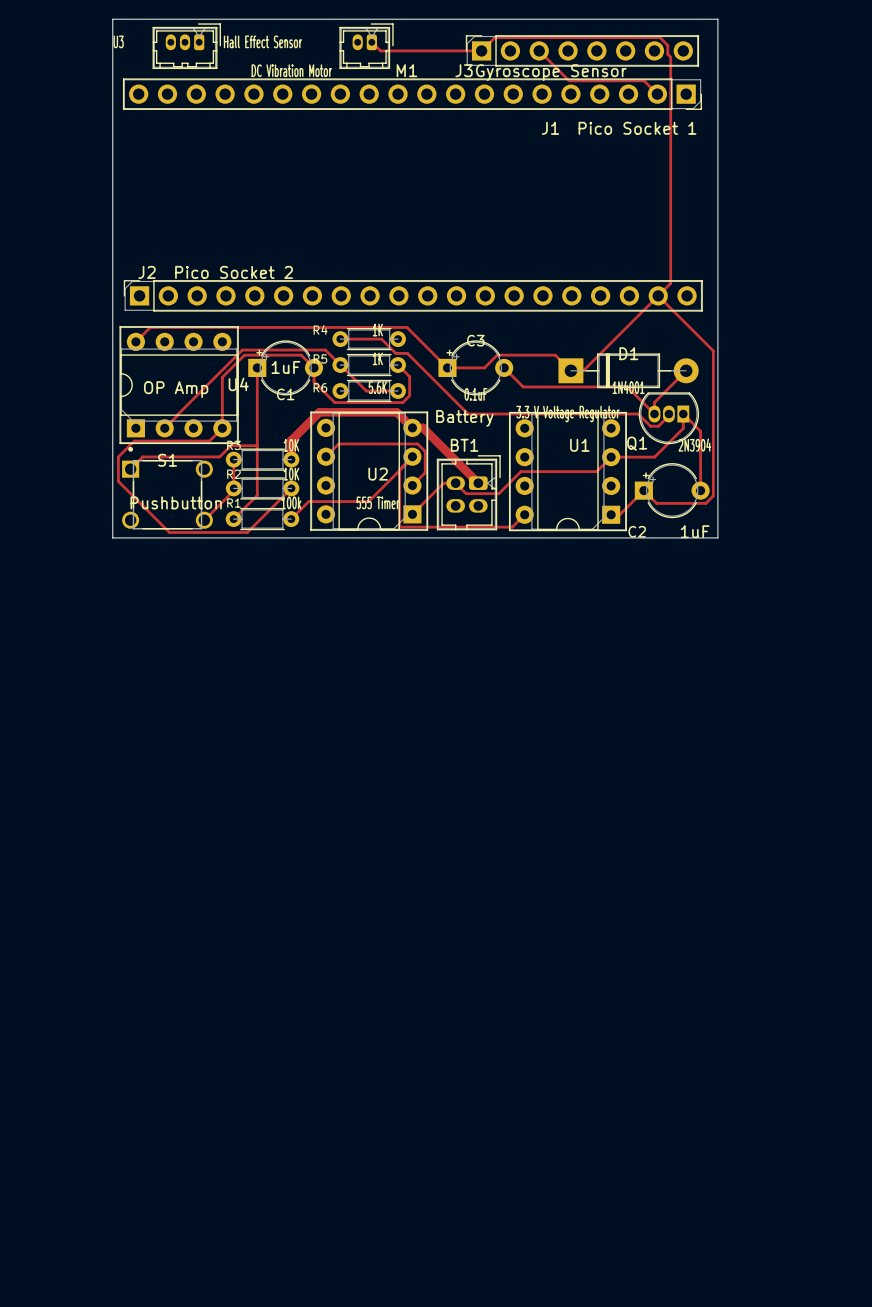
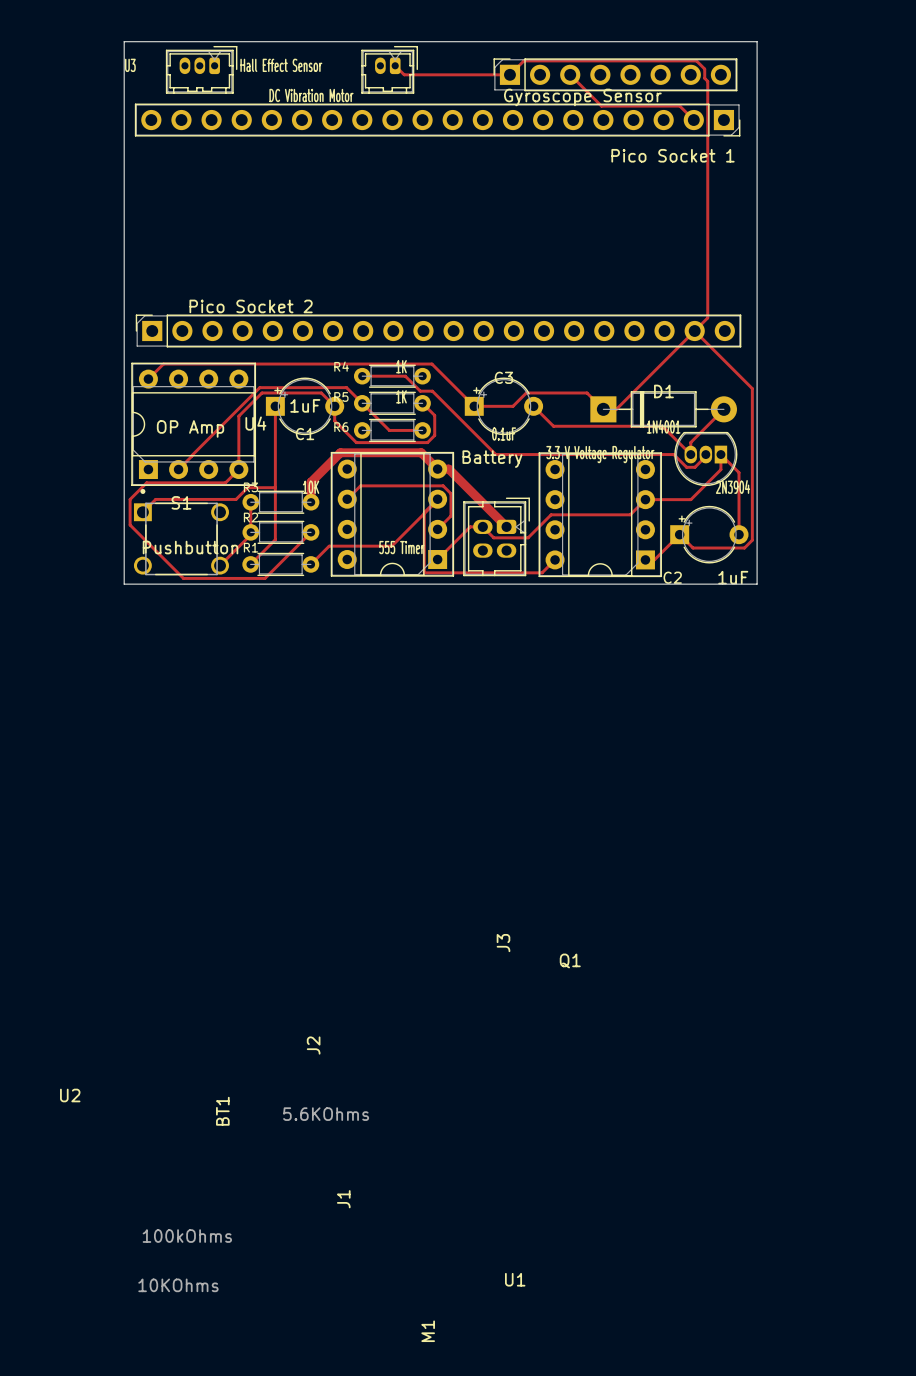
M1 name rotation: 0° (406, 70) -> 90° counterclockwise (428, 1331)
M1 name position: M1 (406, 70) -> M1 (428, 1331)
J3 name rotation: 0° (464, 70) -> 90° counterclockwise (503, 943)
J3 name position: J3 (464, 70) -> J3 (503, 943)
J1 name rotation: 0° (550, 128) -> 90° counterclockwise (343, 1199)
J1 name position: J1 (550, 128) -> J1 (343, 1199)
J2 name rotation: 0° (147, 272) -> 90° counterclockwise (313, 1045)
J2 name position: J2 (147, 272) -> J2 (313, 1045)
R6 value: 5.6K (377, 387) -> 5.6KOhms (326, 1114)
Q1 name position: Q1 (637, 443) -> Q1 (570, 960)
BT1 name rotation: 0° (464, 445) -> 90° counterclockwise (222, 1111)
BT1 name position: BT1 (464, 445) -> BT1 (222, 1111)
U1 name position: U1 (579, 445) -> U1 (515, 1279)
R2 value: 10K (291, 474) -> 10KOhms (178, 1285)
U2 name position: U2 (378, 474) -> U2 (70, 1095)
R1 value: 100k (291, 502) -> 100kOhms (187, 1236)

